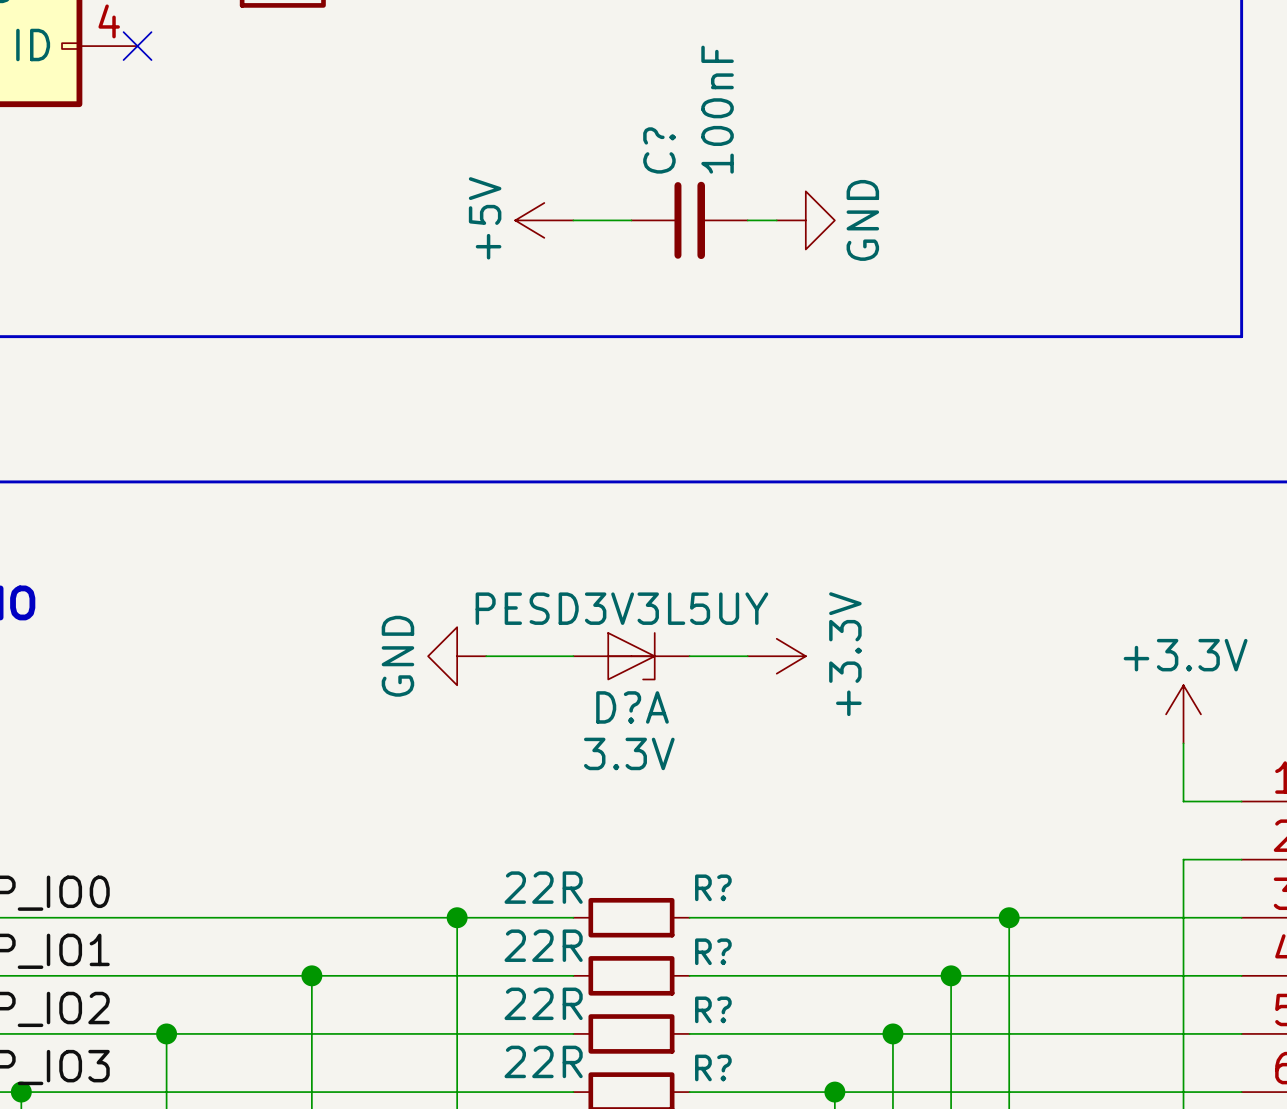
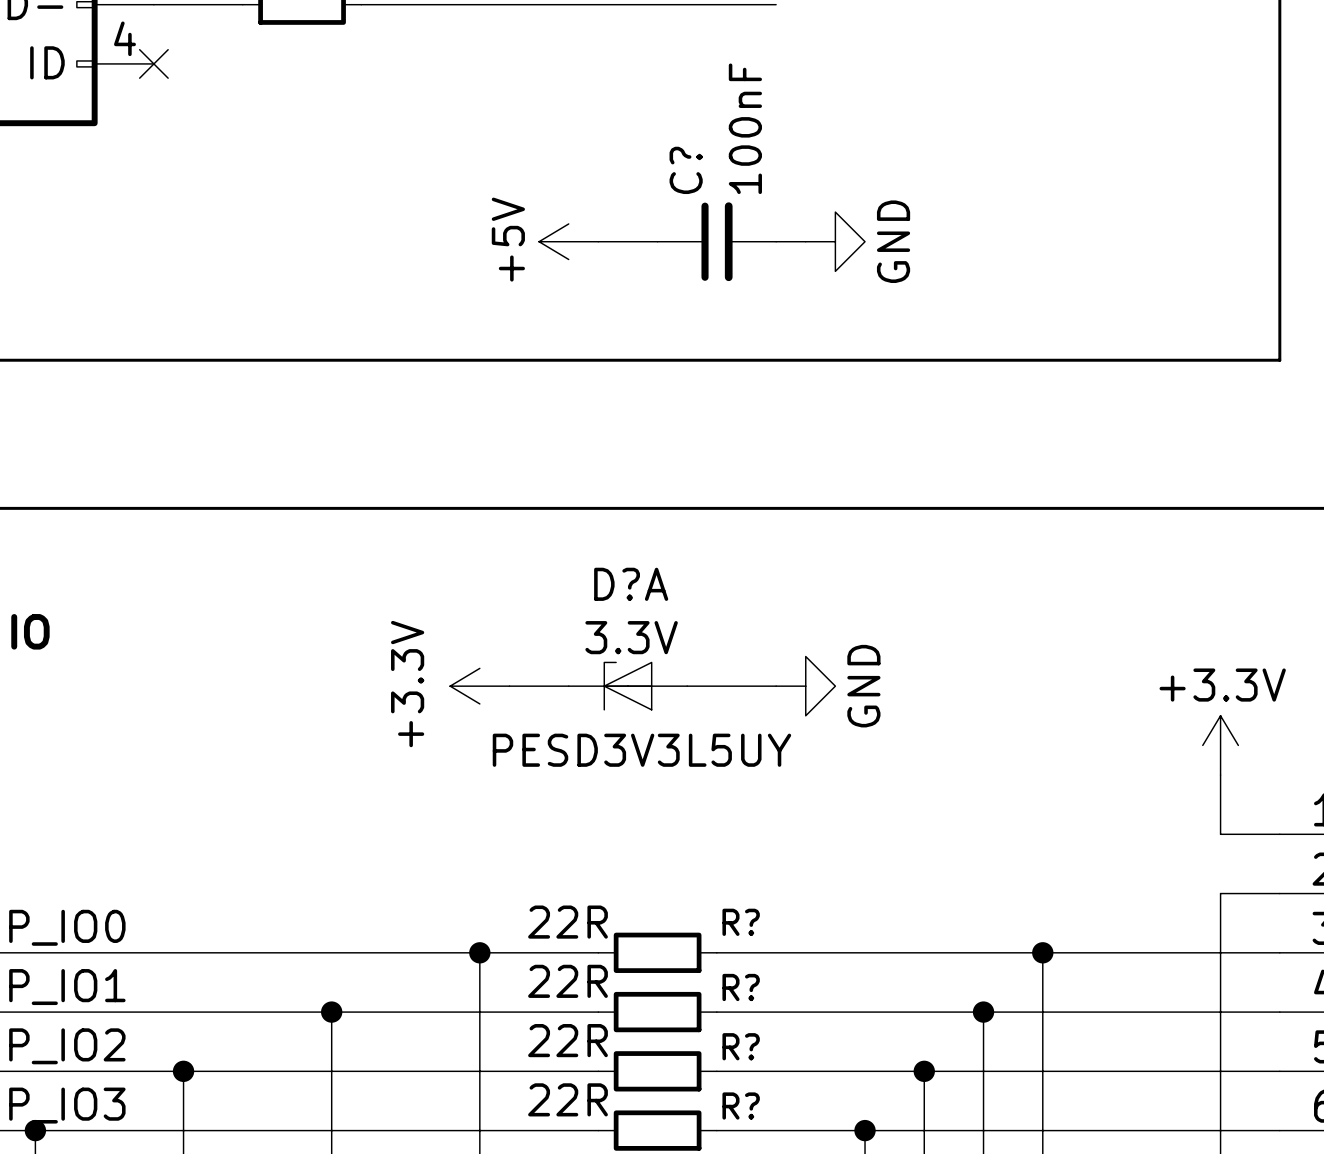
power symbol: GND (457, 656) -> +3.3V (479, 686)
D?A rotation: 0° (631, 656) -> 180° (627, 686)
power symbol: +3.3V (776, 656) -> GND (805, 686)
D?A value position: 3.3V (629, 753) -> 3.3V (631, 637)

